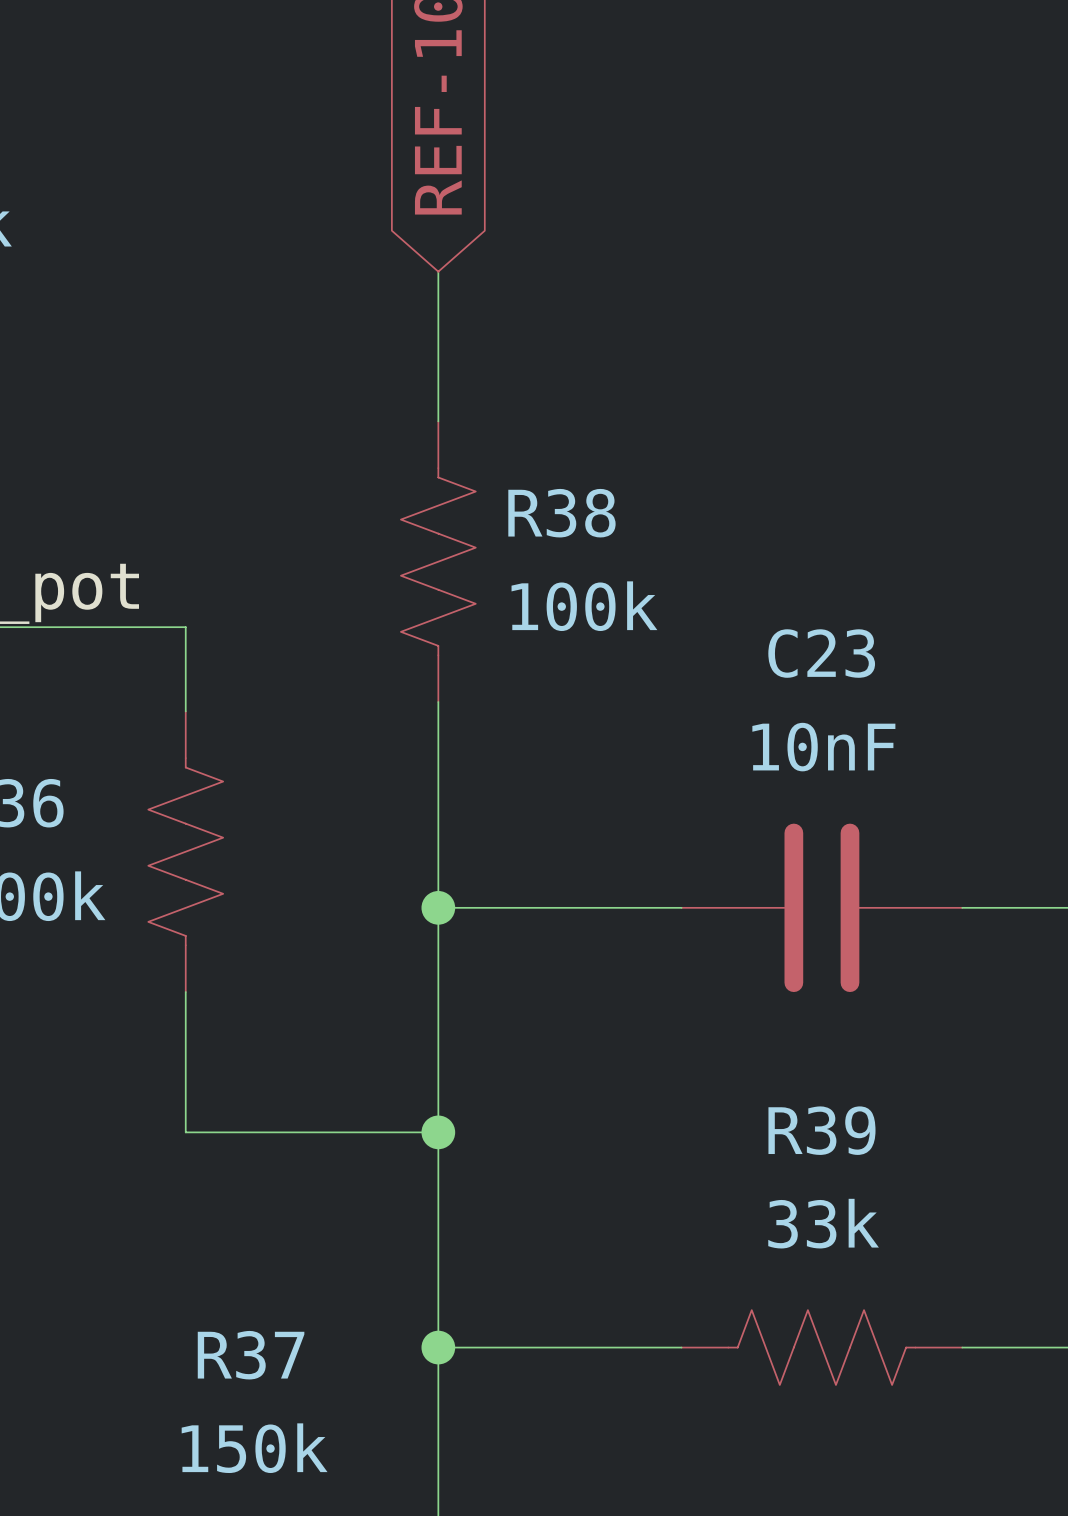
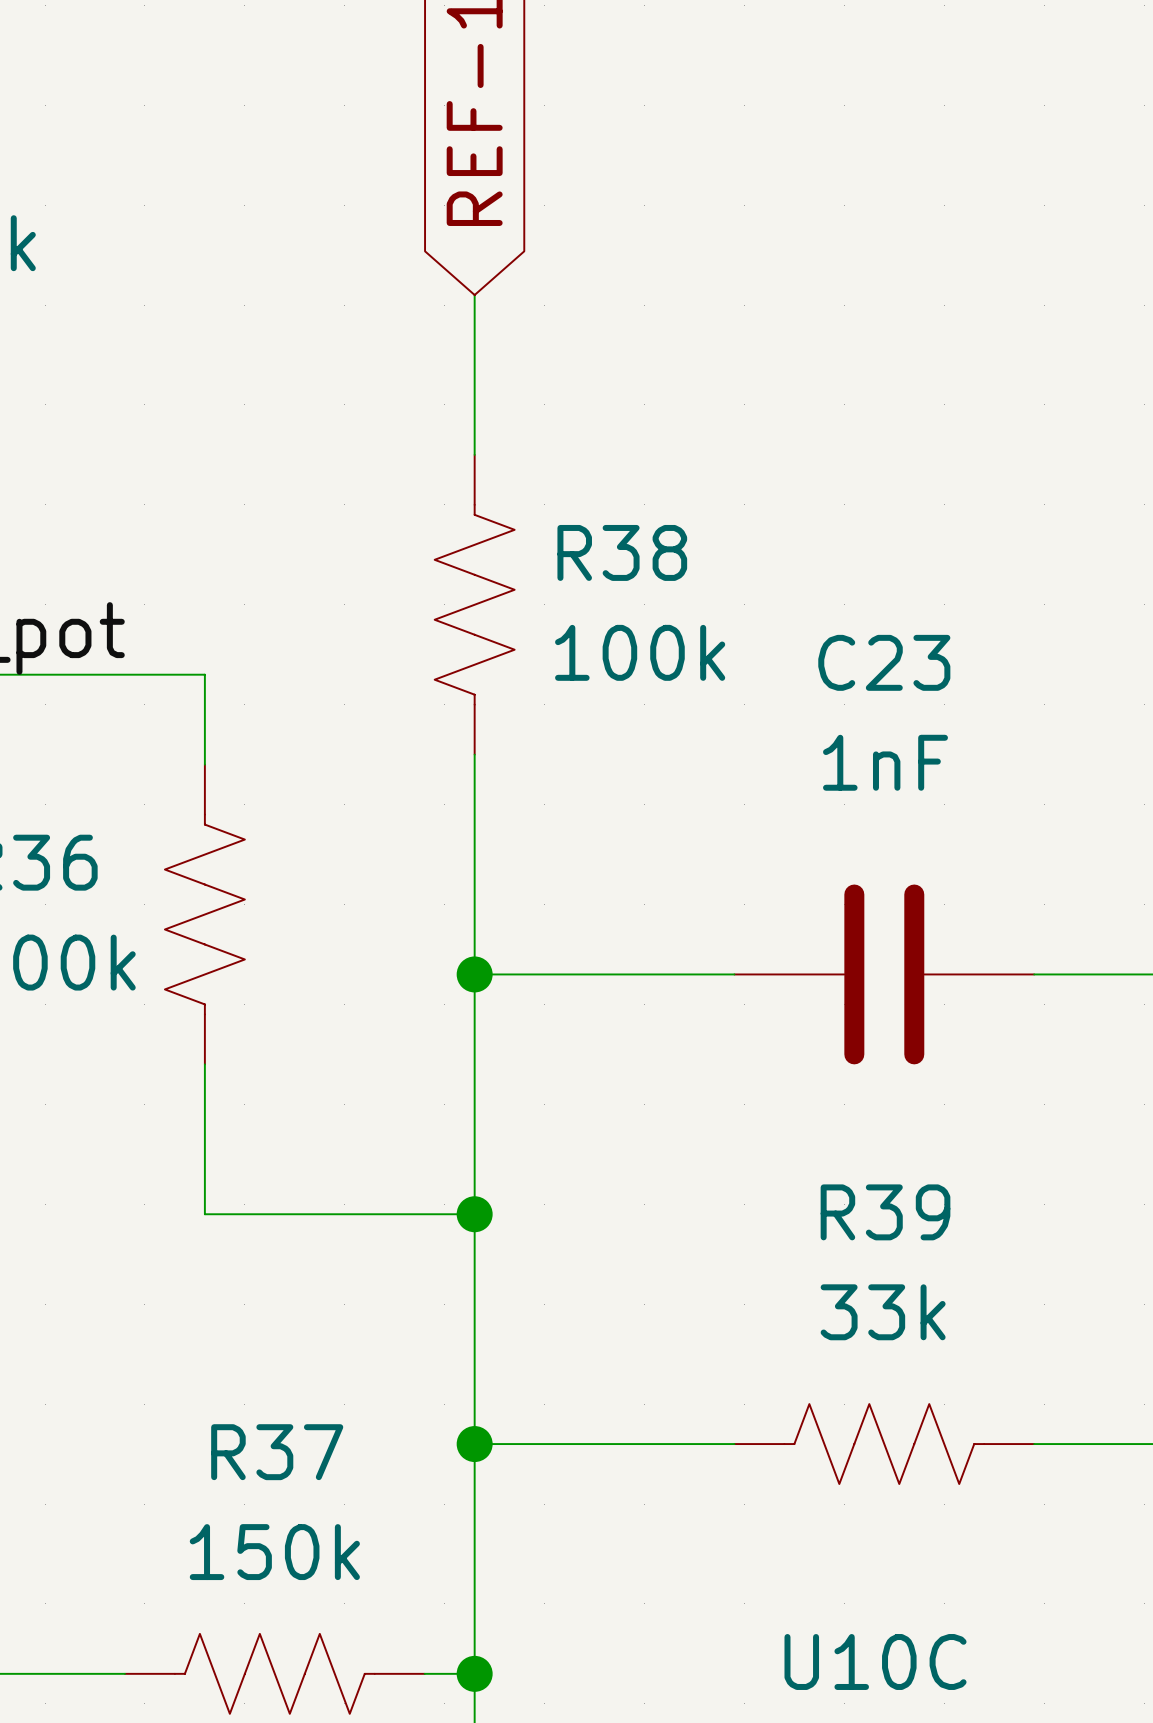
C23 name position: C23 (821, 653) -> C23 (884, 662)
C23 value: 10nF (823, 747) -> 1nF (885, 762)

